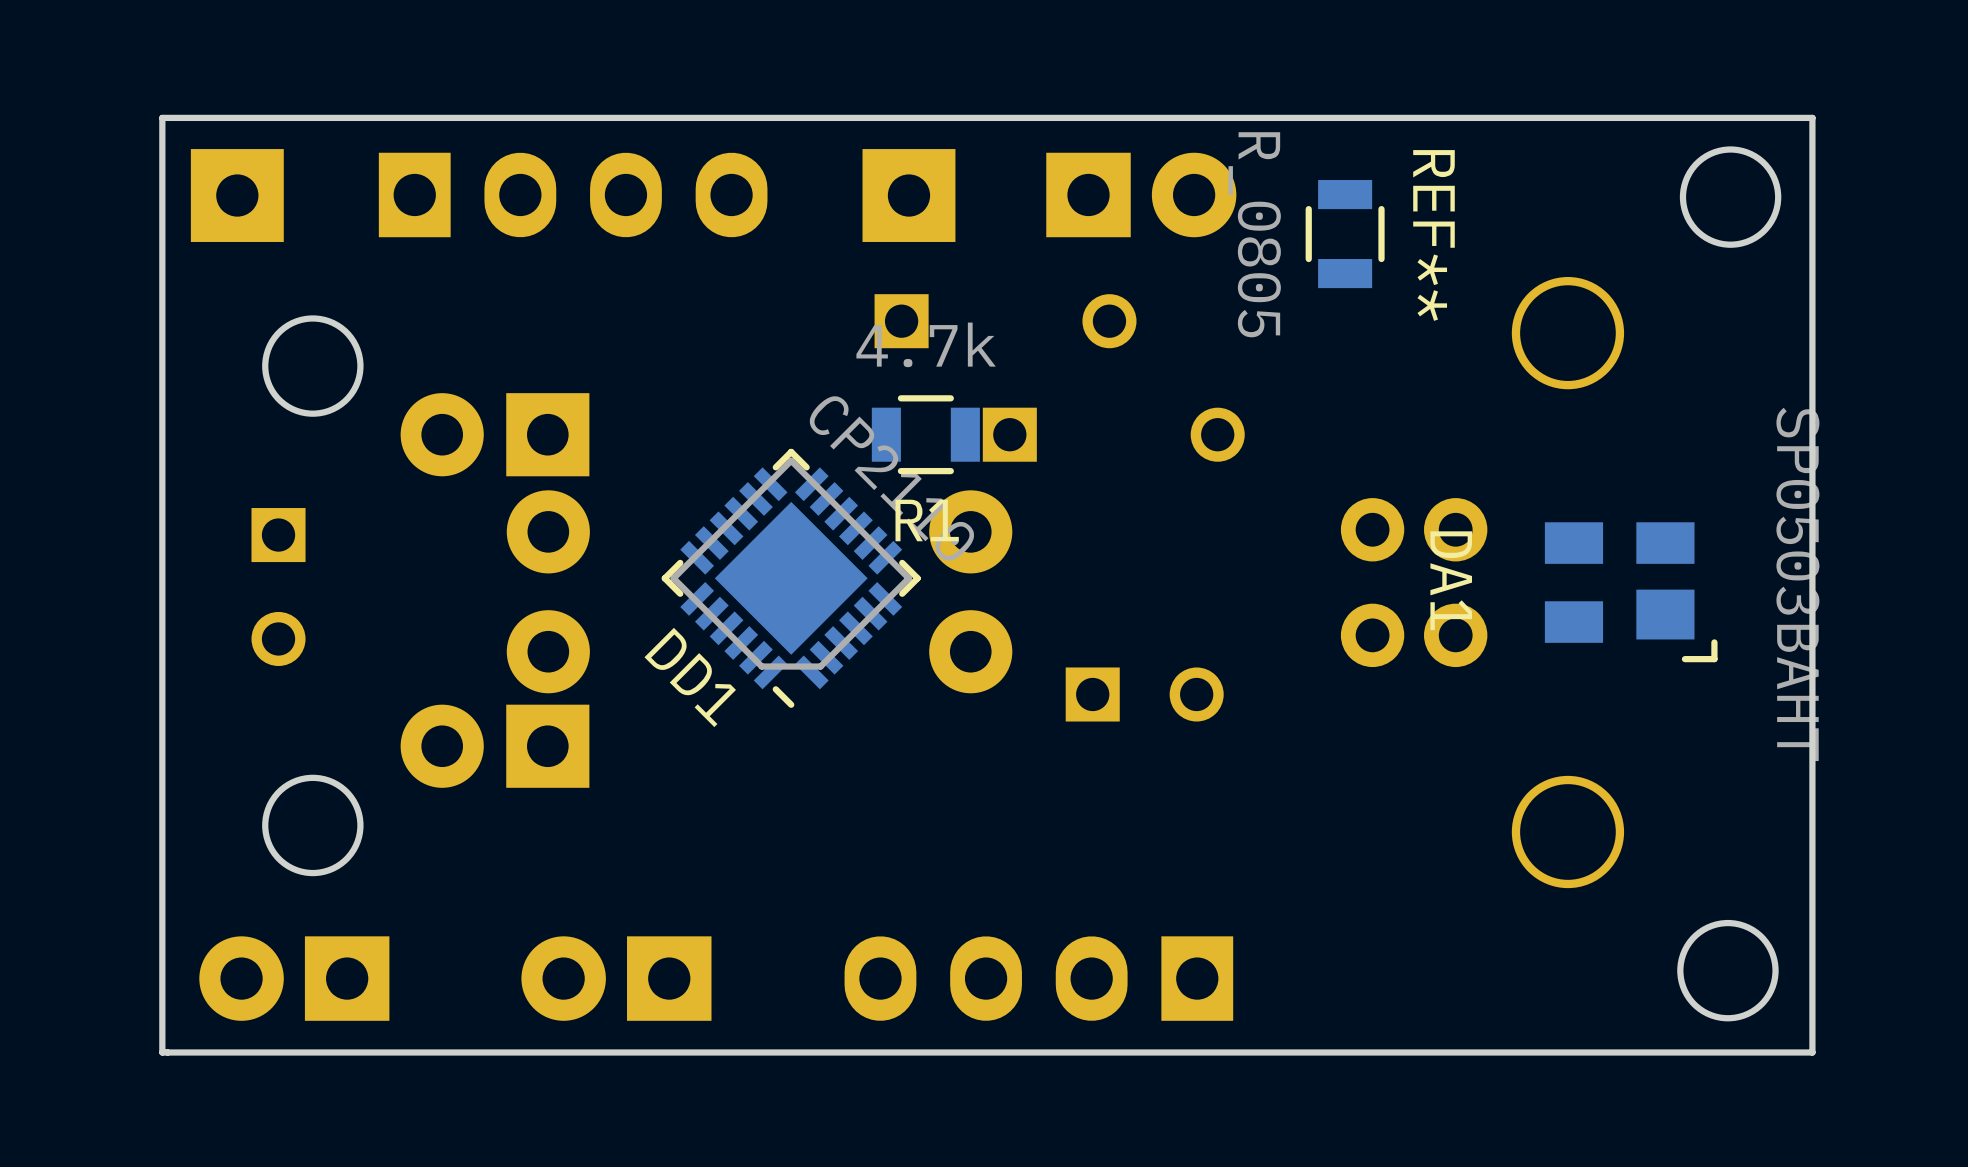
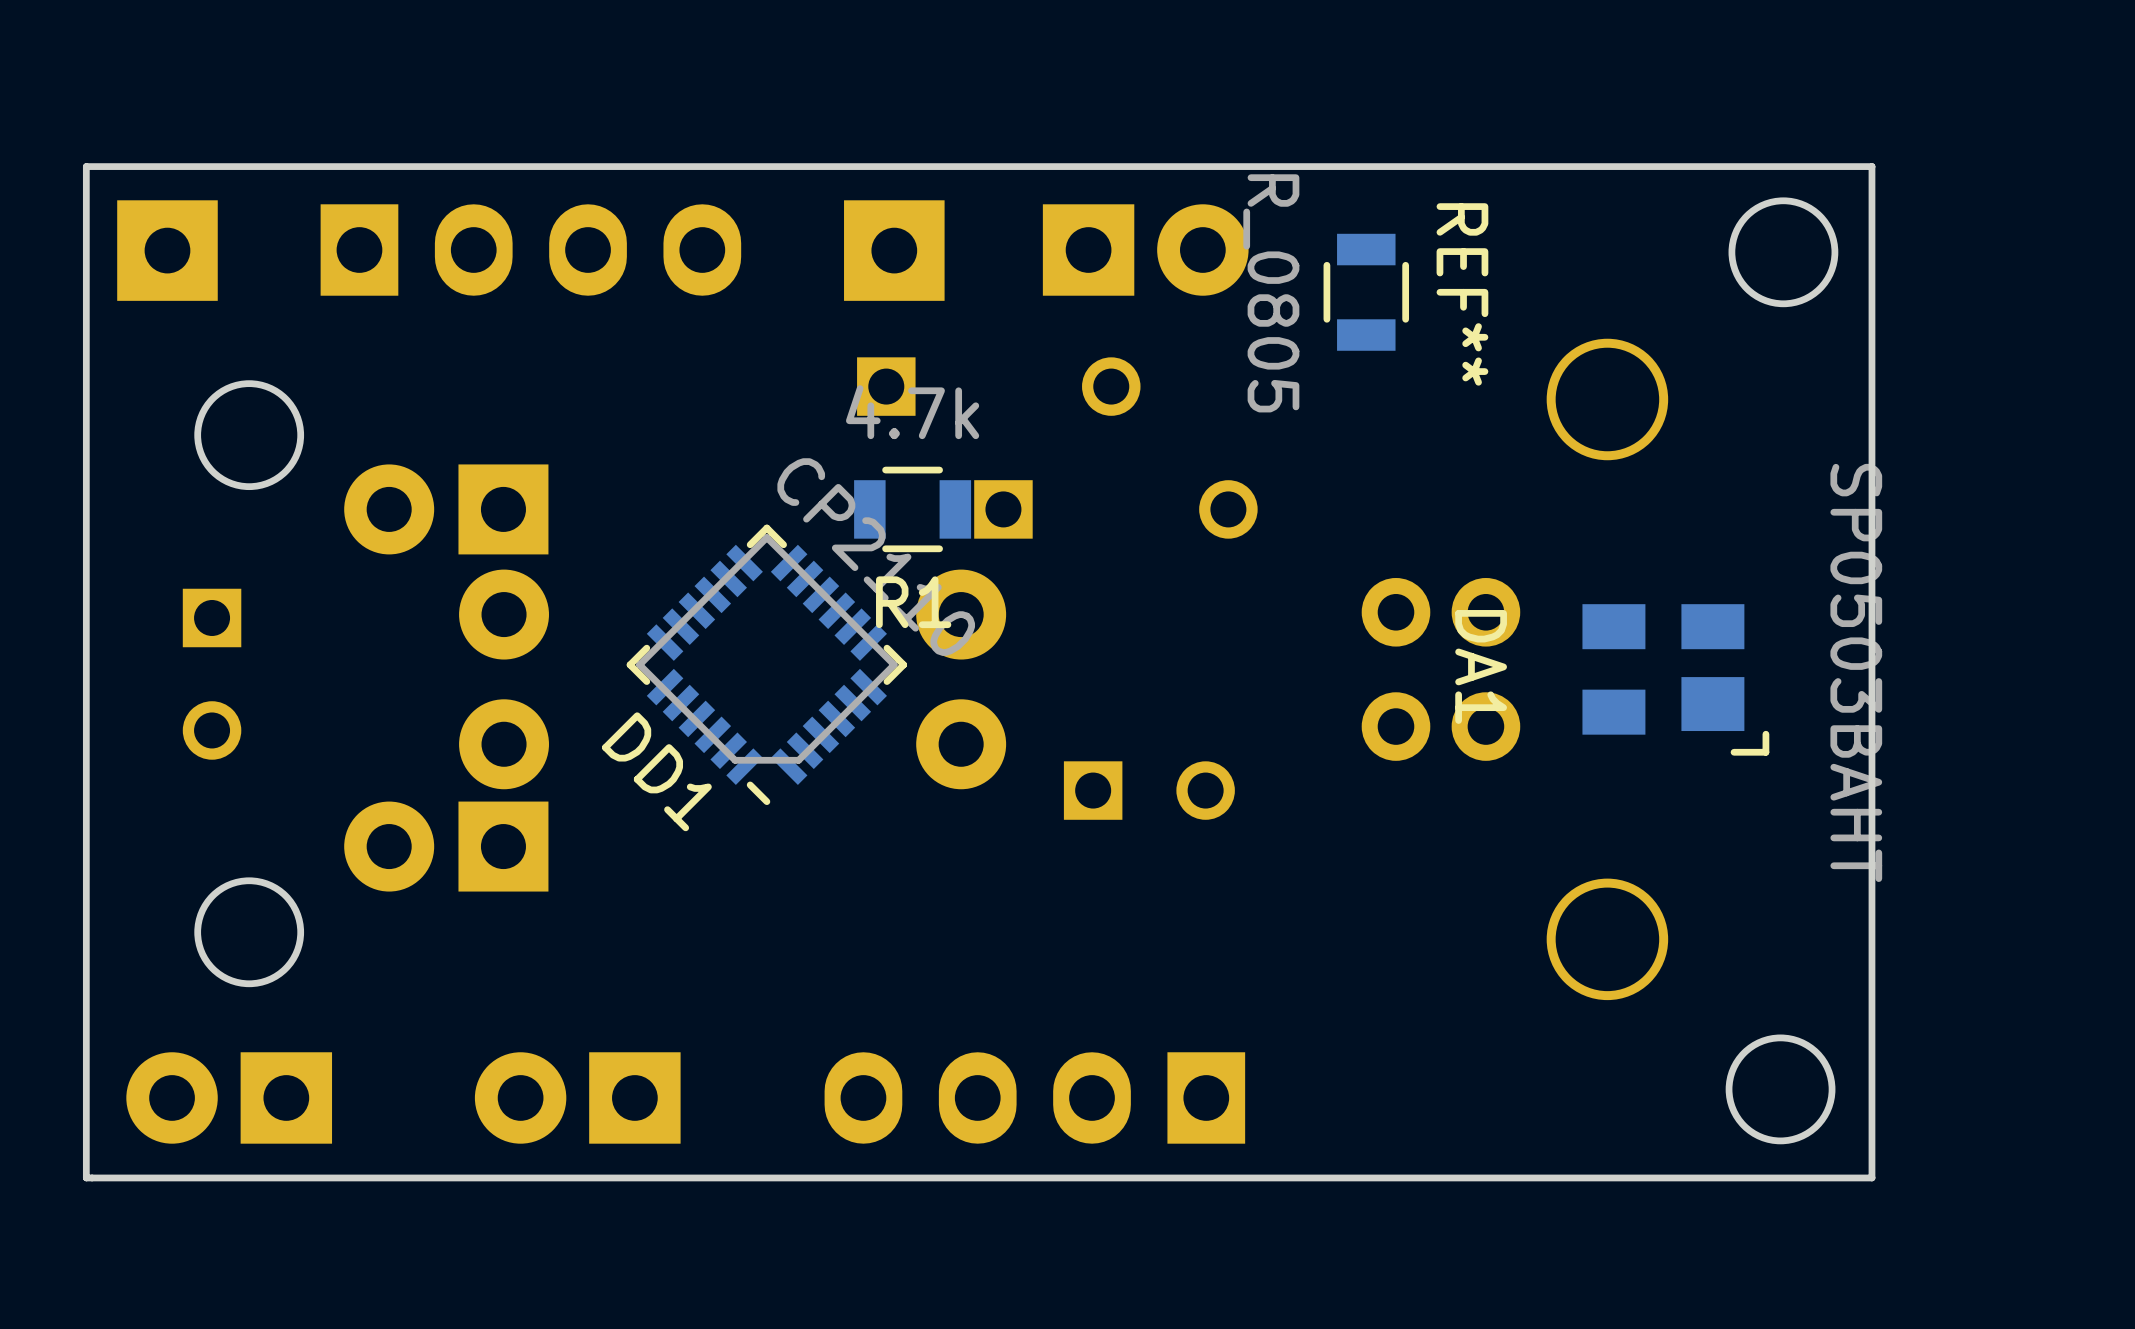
DD1 footprint: [661, 448, 921, 708] -> [626, 524, 908, 806]

